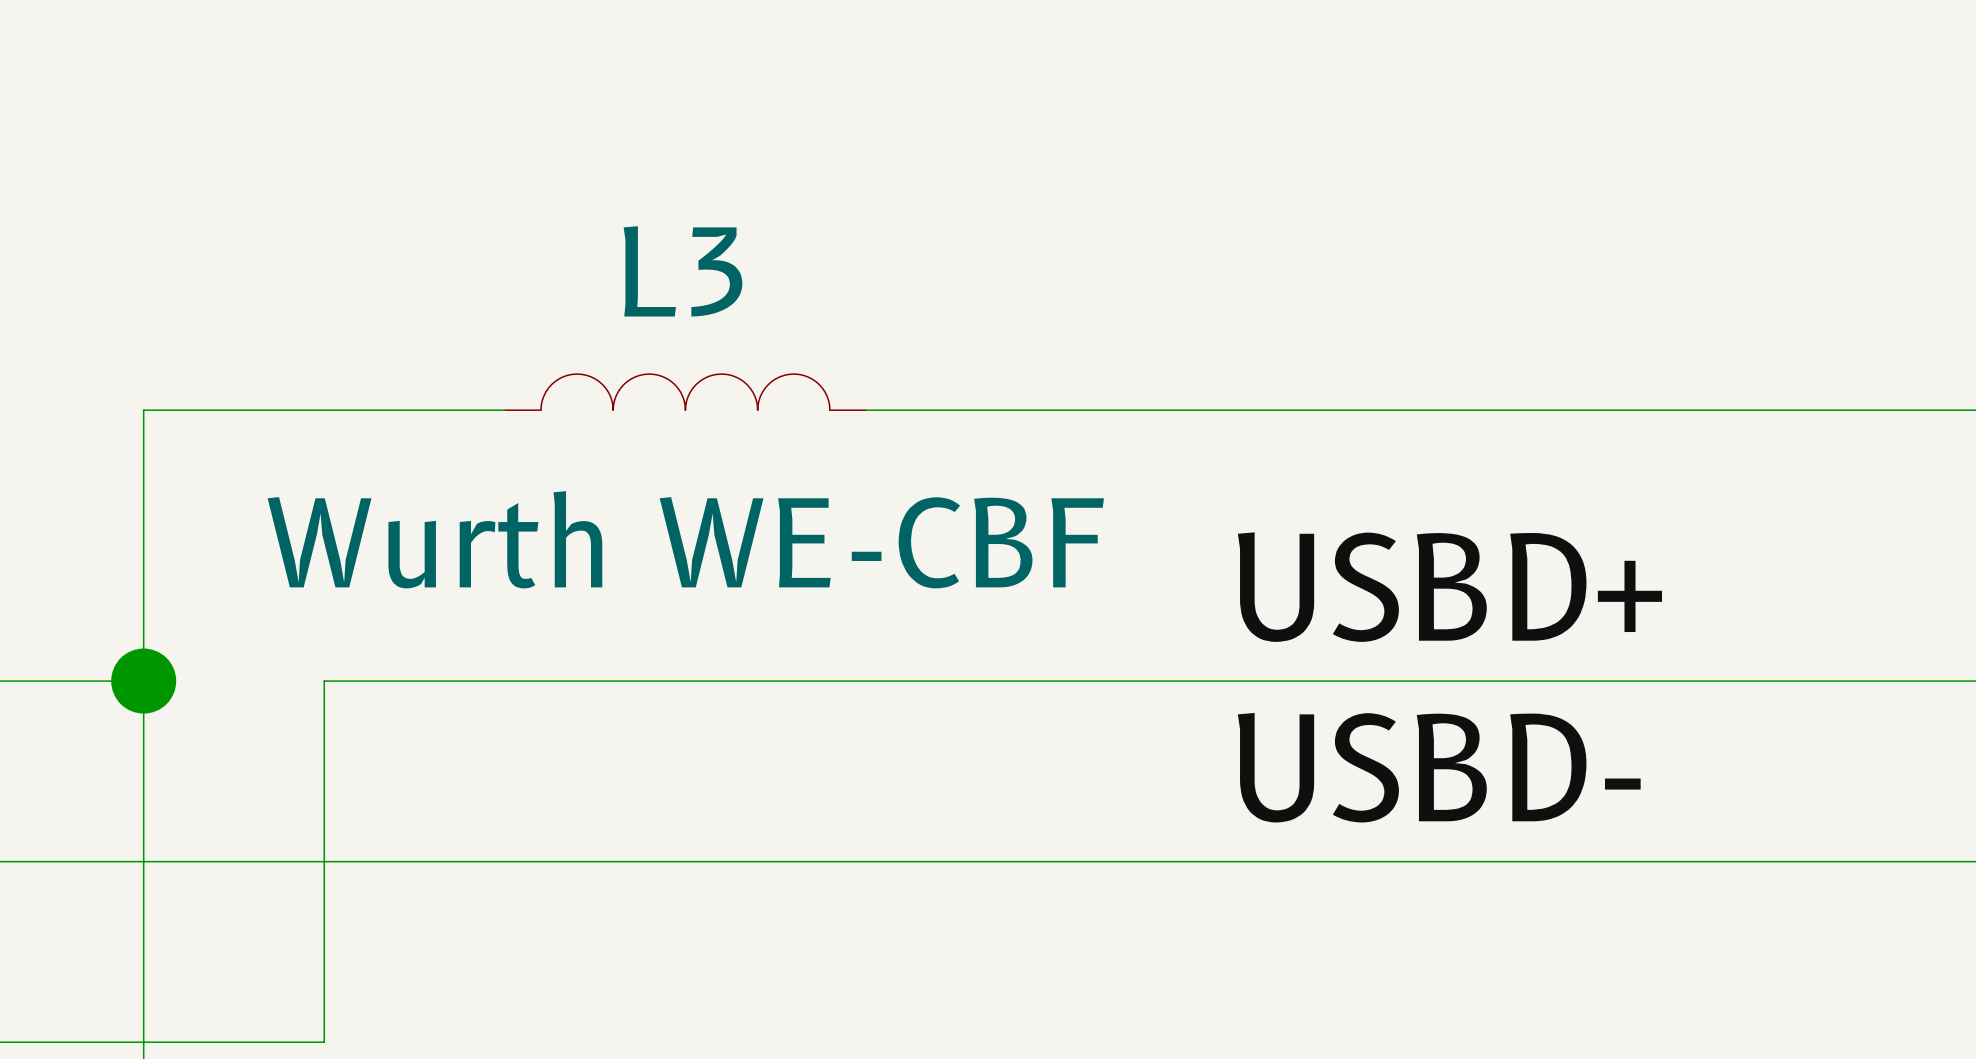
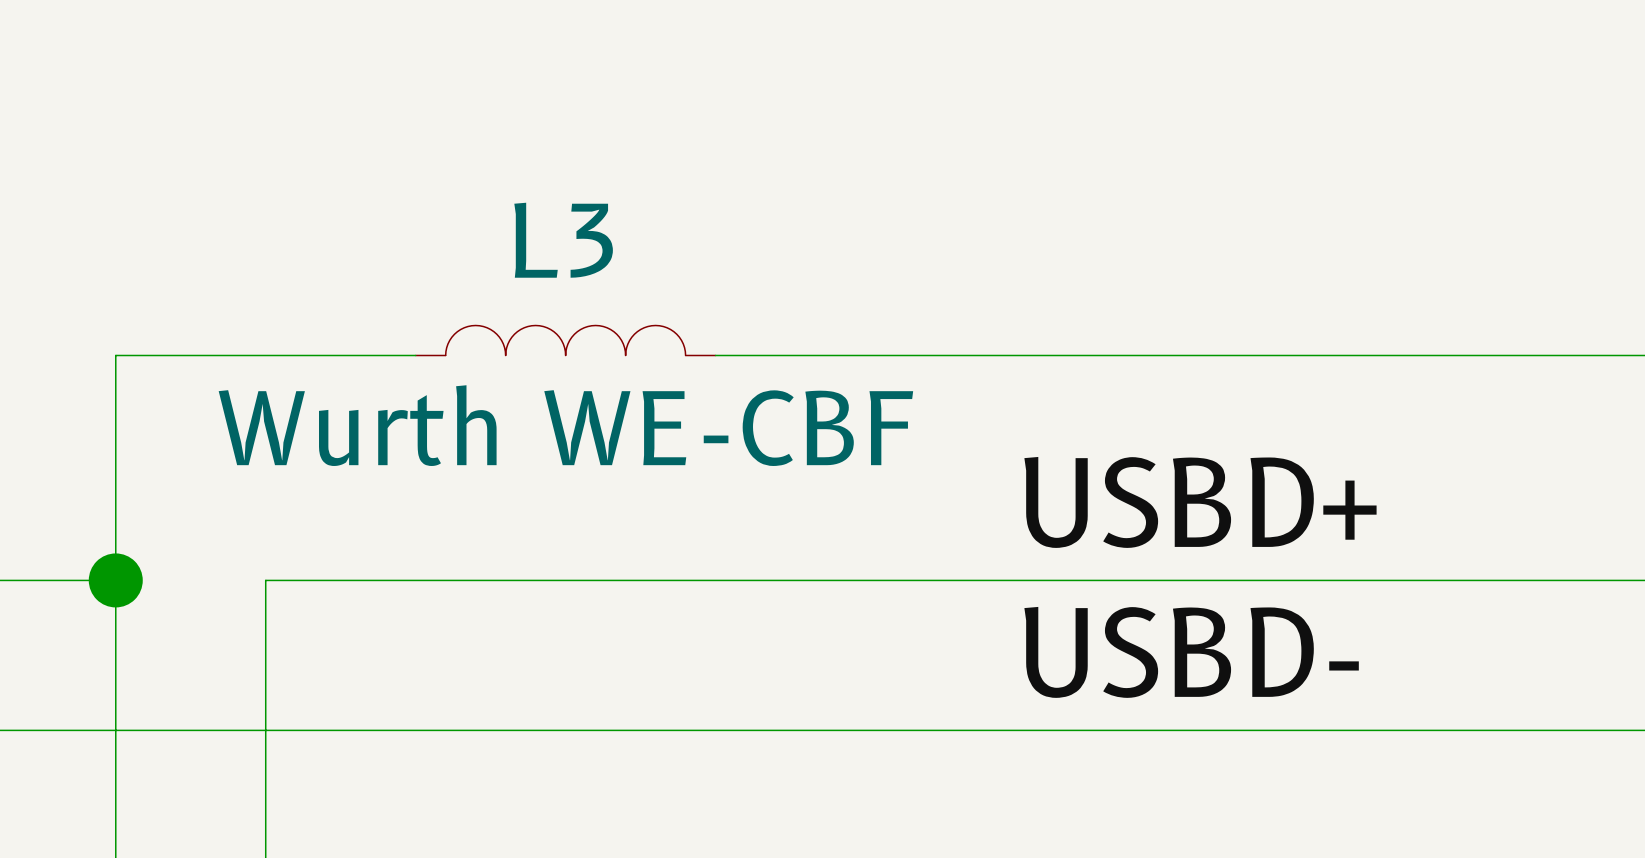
L3 value position: Wurth WE-CBF (685, 539) -> Wurth WE-CBF (565, 425)

